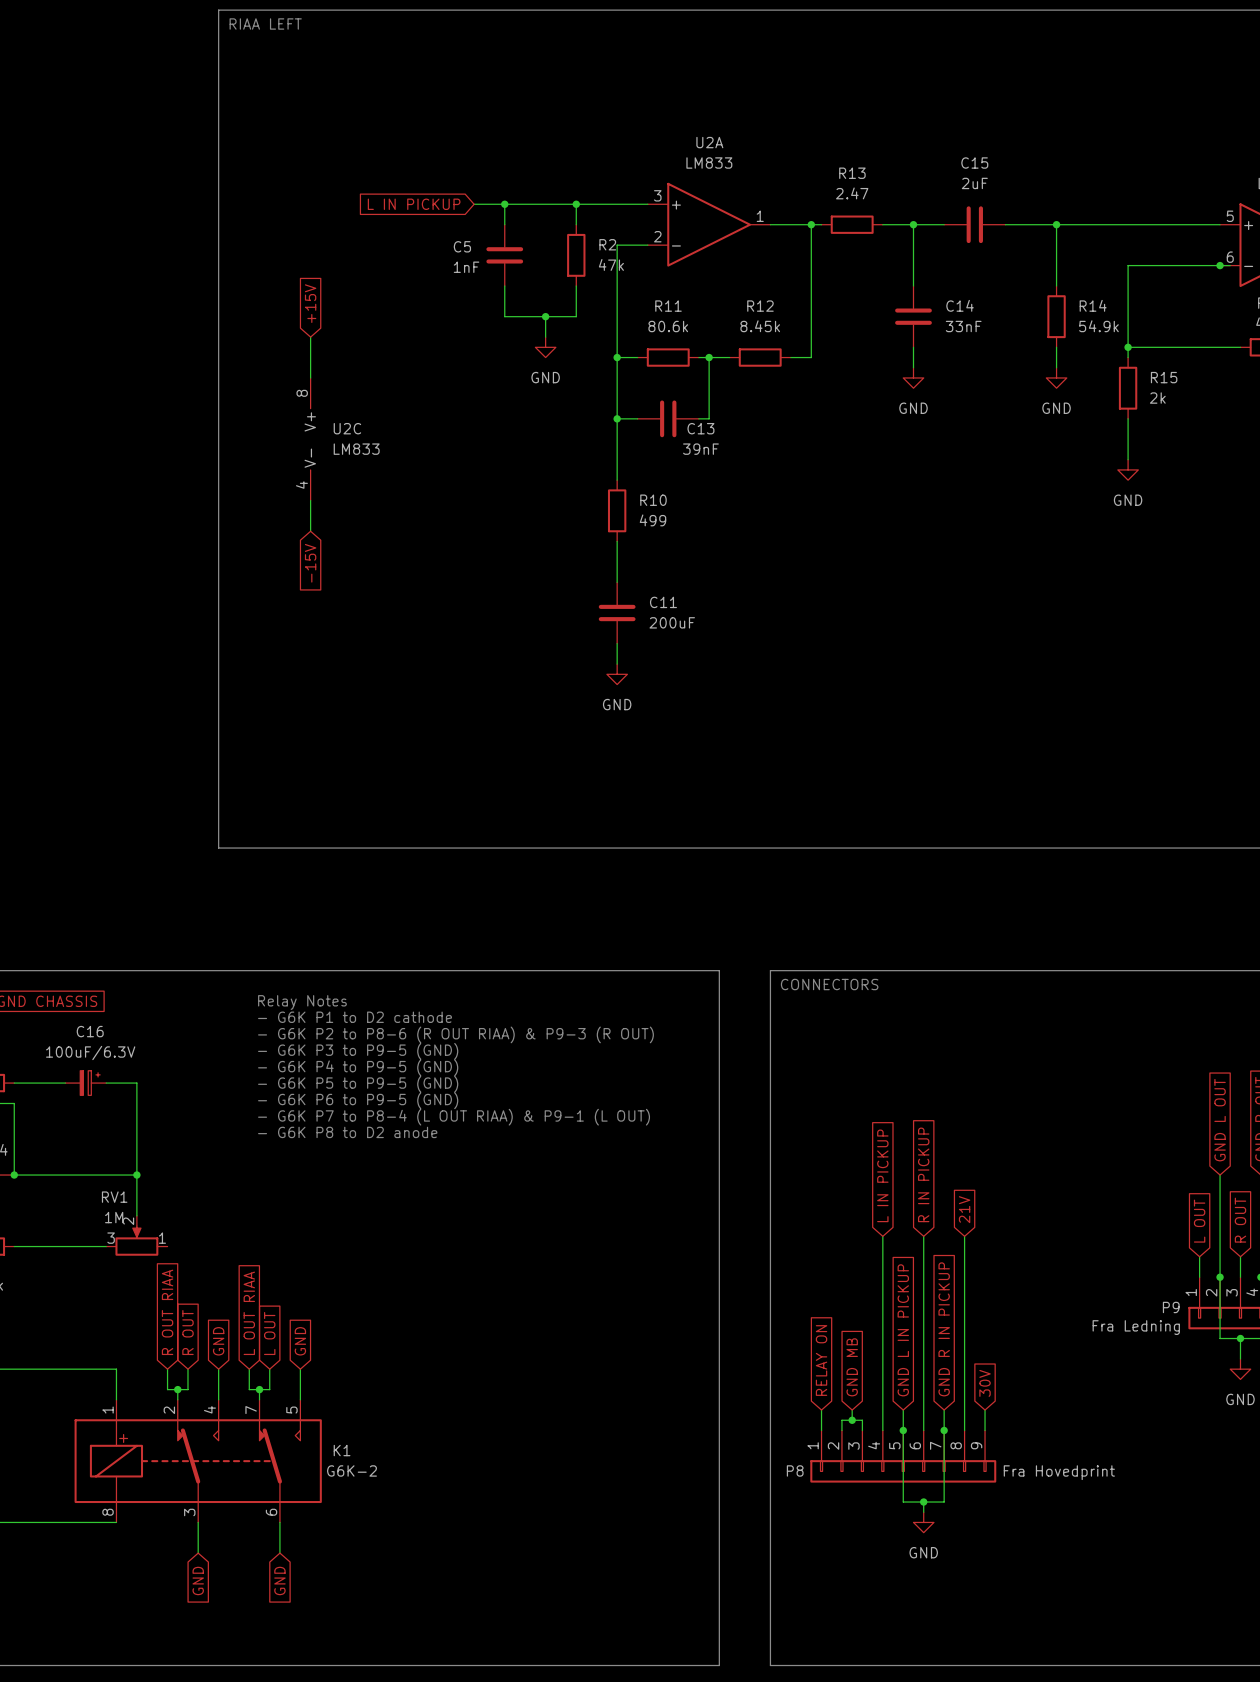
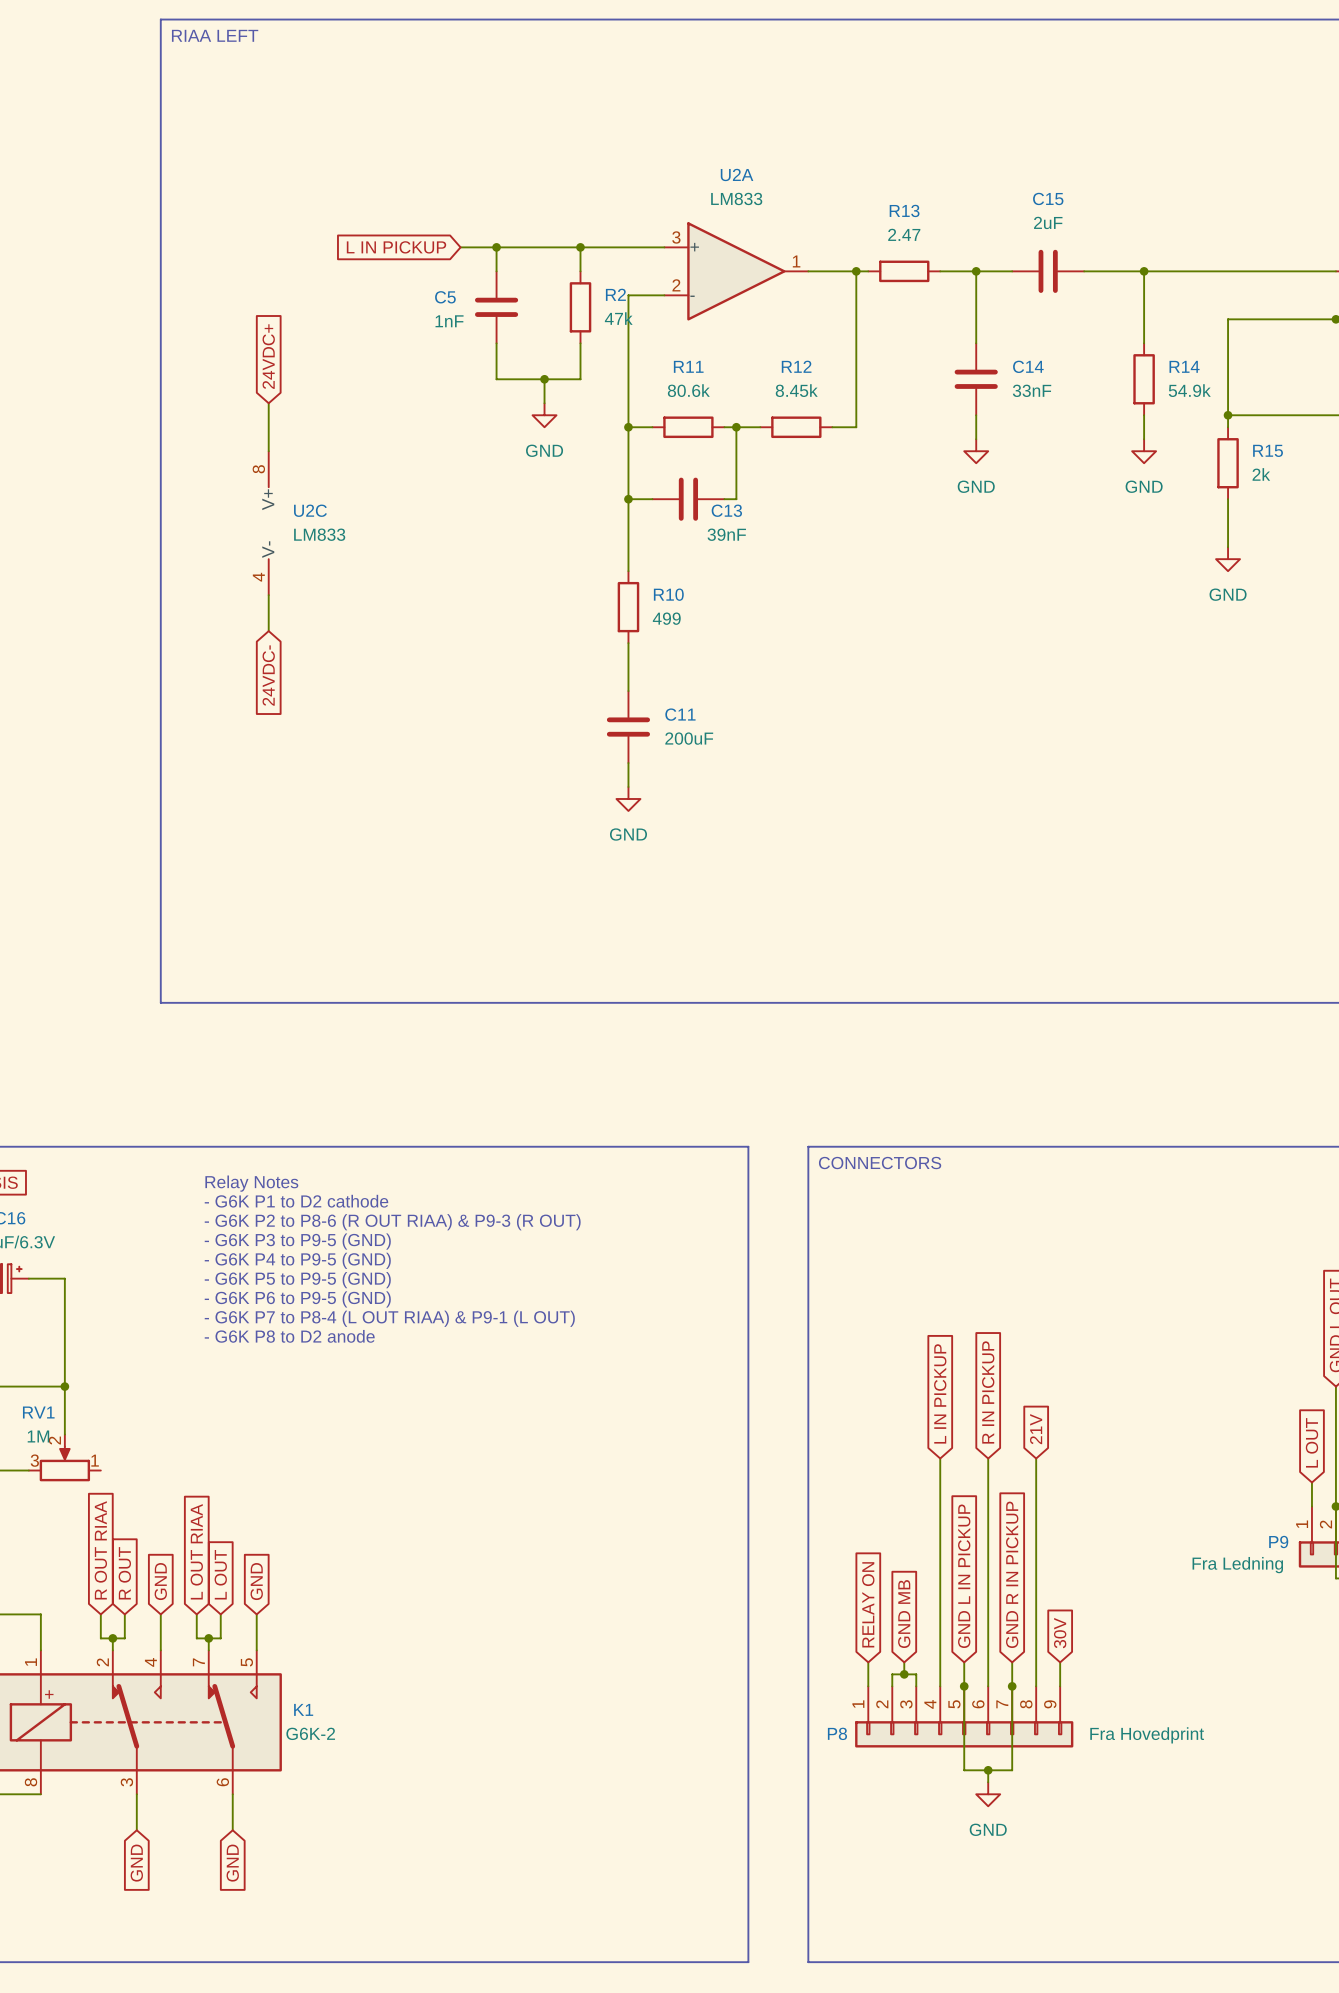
global label: +15V (310, 303) -> 24VDC+ (268, 356)
global label: -15V (310, 563) -> 24VDC- (268, 675)

